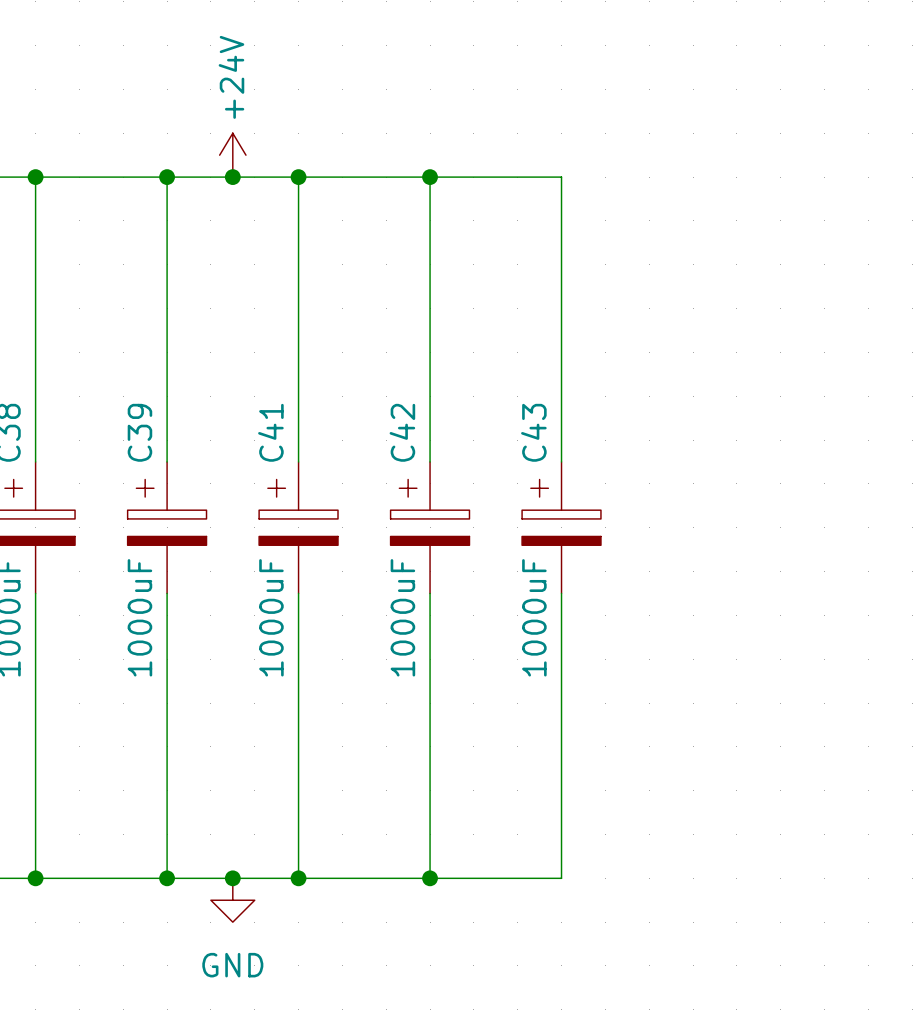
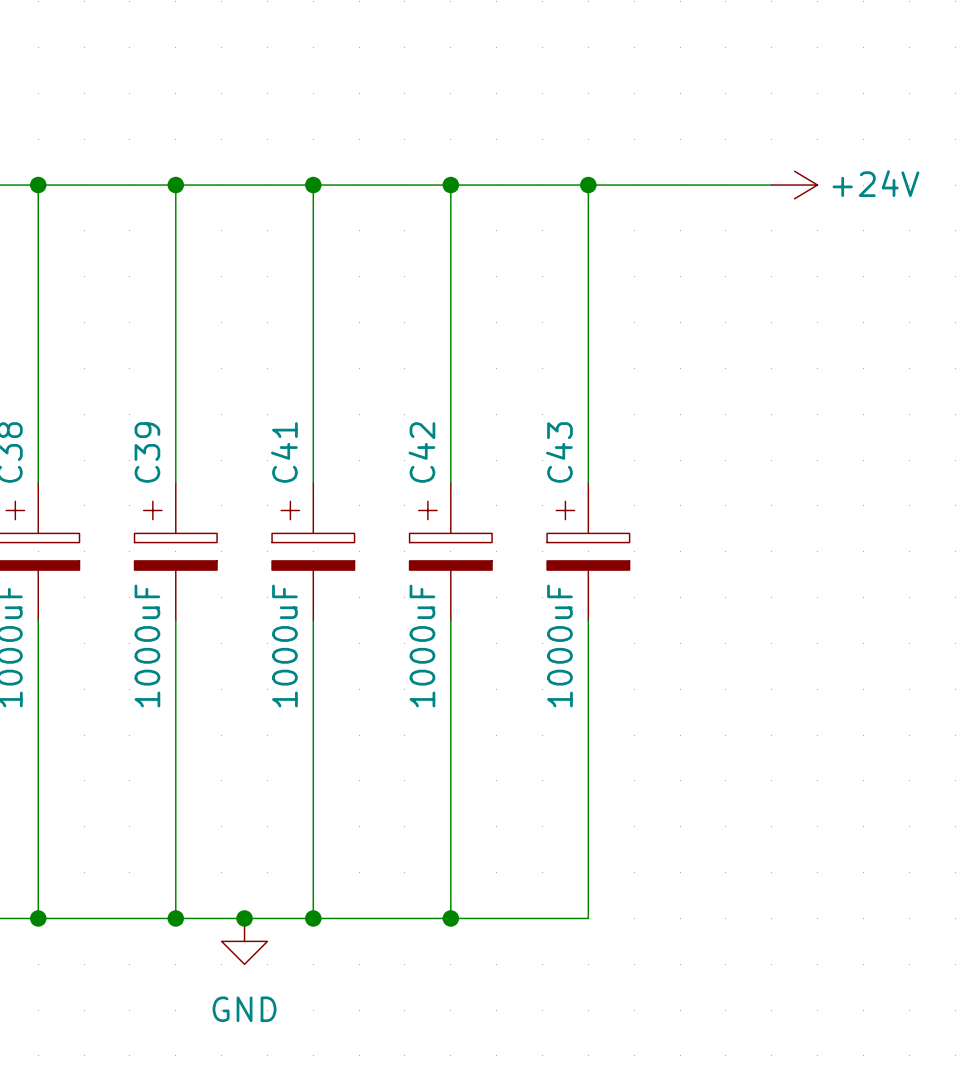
power symbol: +24V (232, 155) -> none
junction: (232, 177) -> none
wire: none -> (588, 185) (771, 185)
junction: none -> (588, 185)
power symbol: none -> +24V (794, 185)

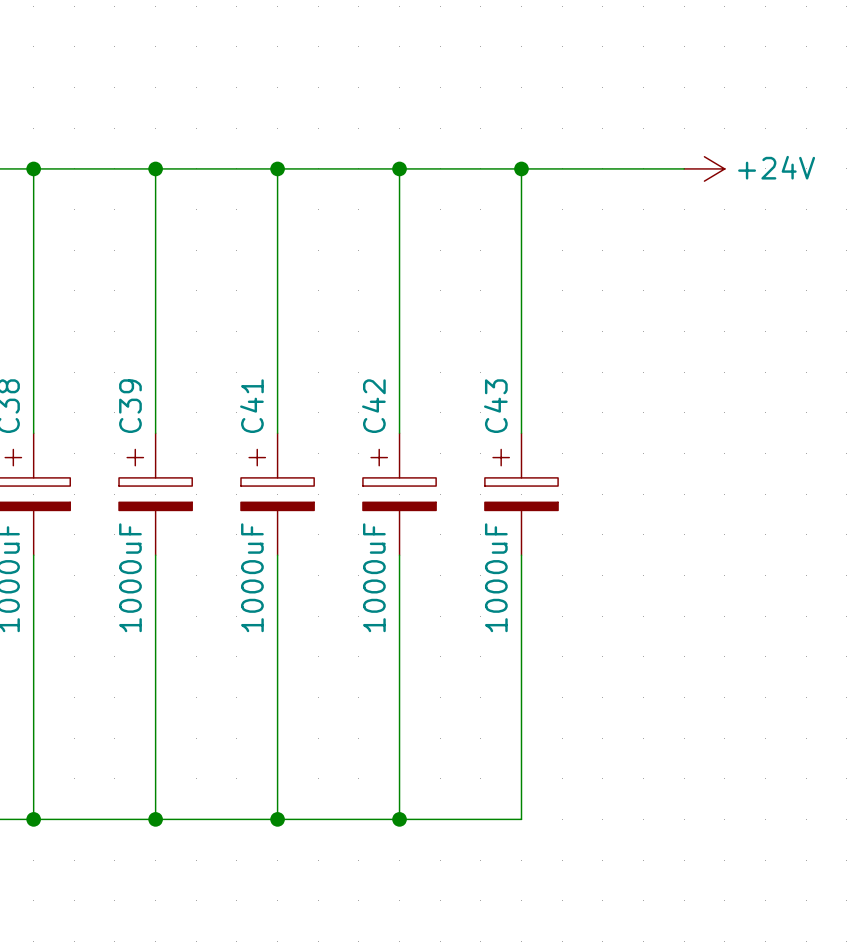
junction: (244, 918) -> none
power symbol: GND (244, 941) -> none

